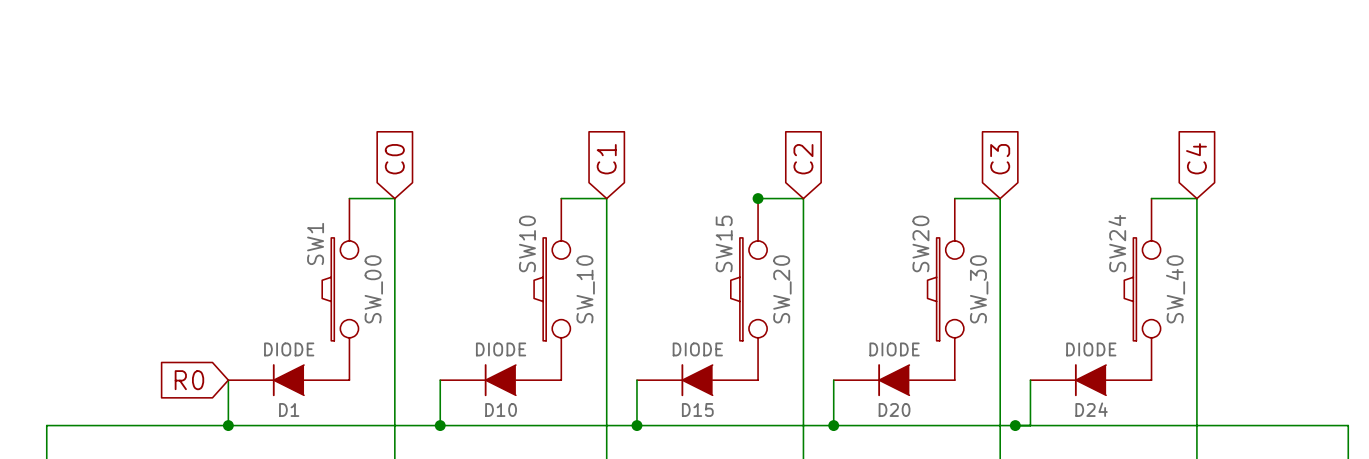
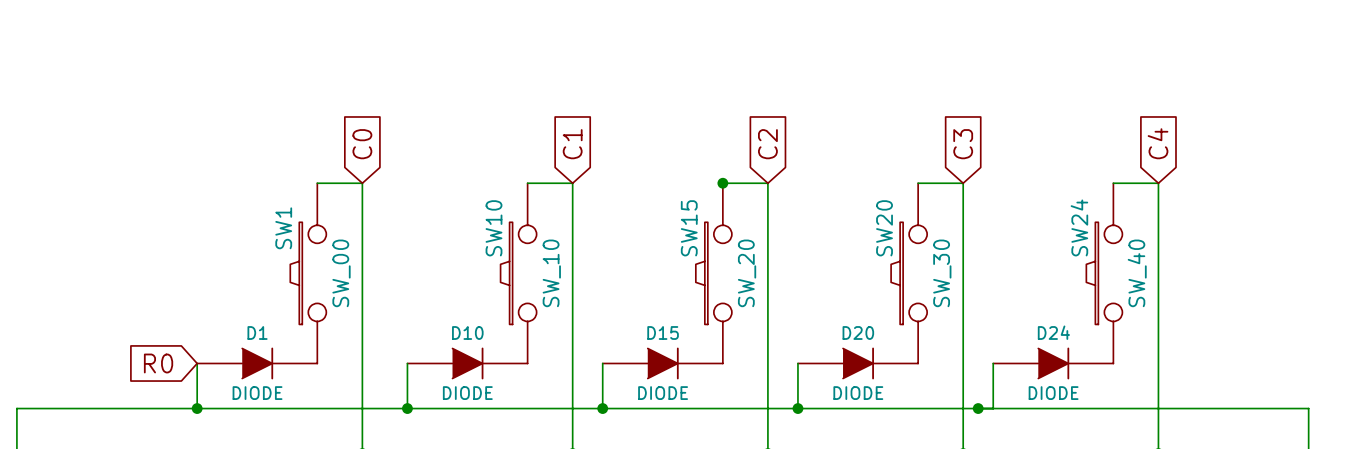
D1 rotation: 0° (288, 380) -> 180° (257, 363)
D10 rotation: 0° (500, 380) -> 180° (467, 363)
D15 rotation: 0° (697, 380) -> 180° (663, 363)
D20 rotation: 0° (893, 380) -> 180° (858, 363)
D24 rotation: 0° (1090, 380) -> 180° (1053, 363)

